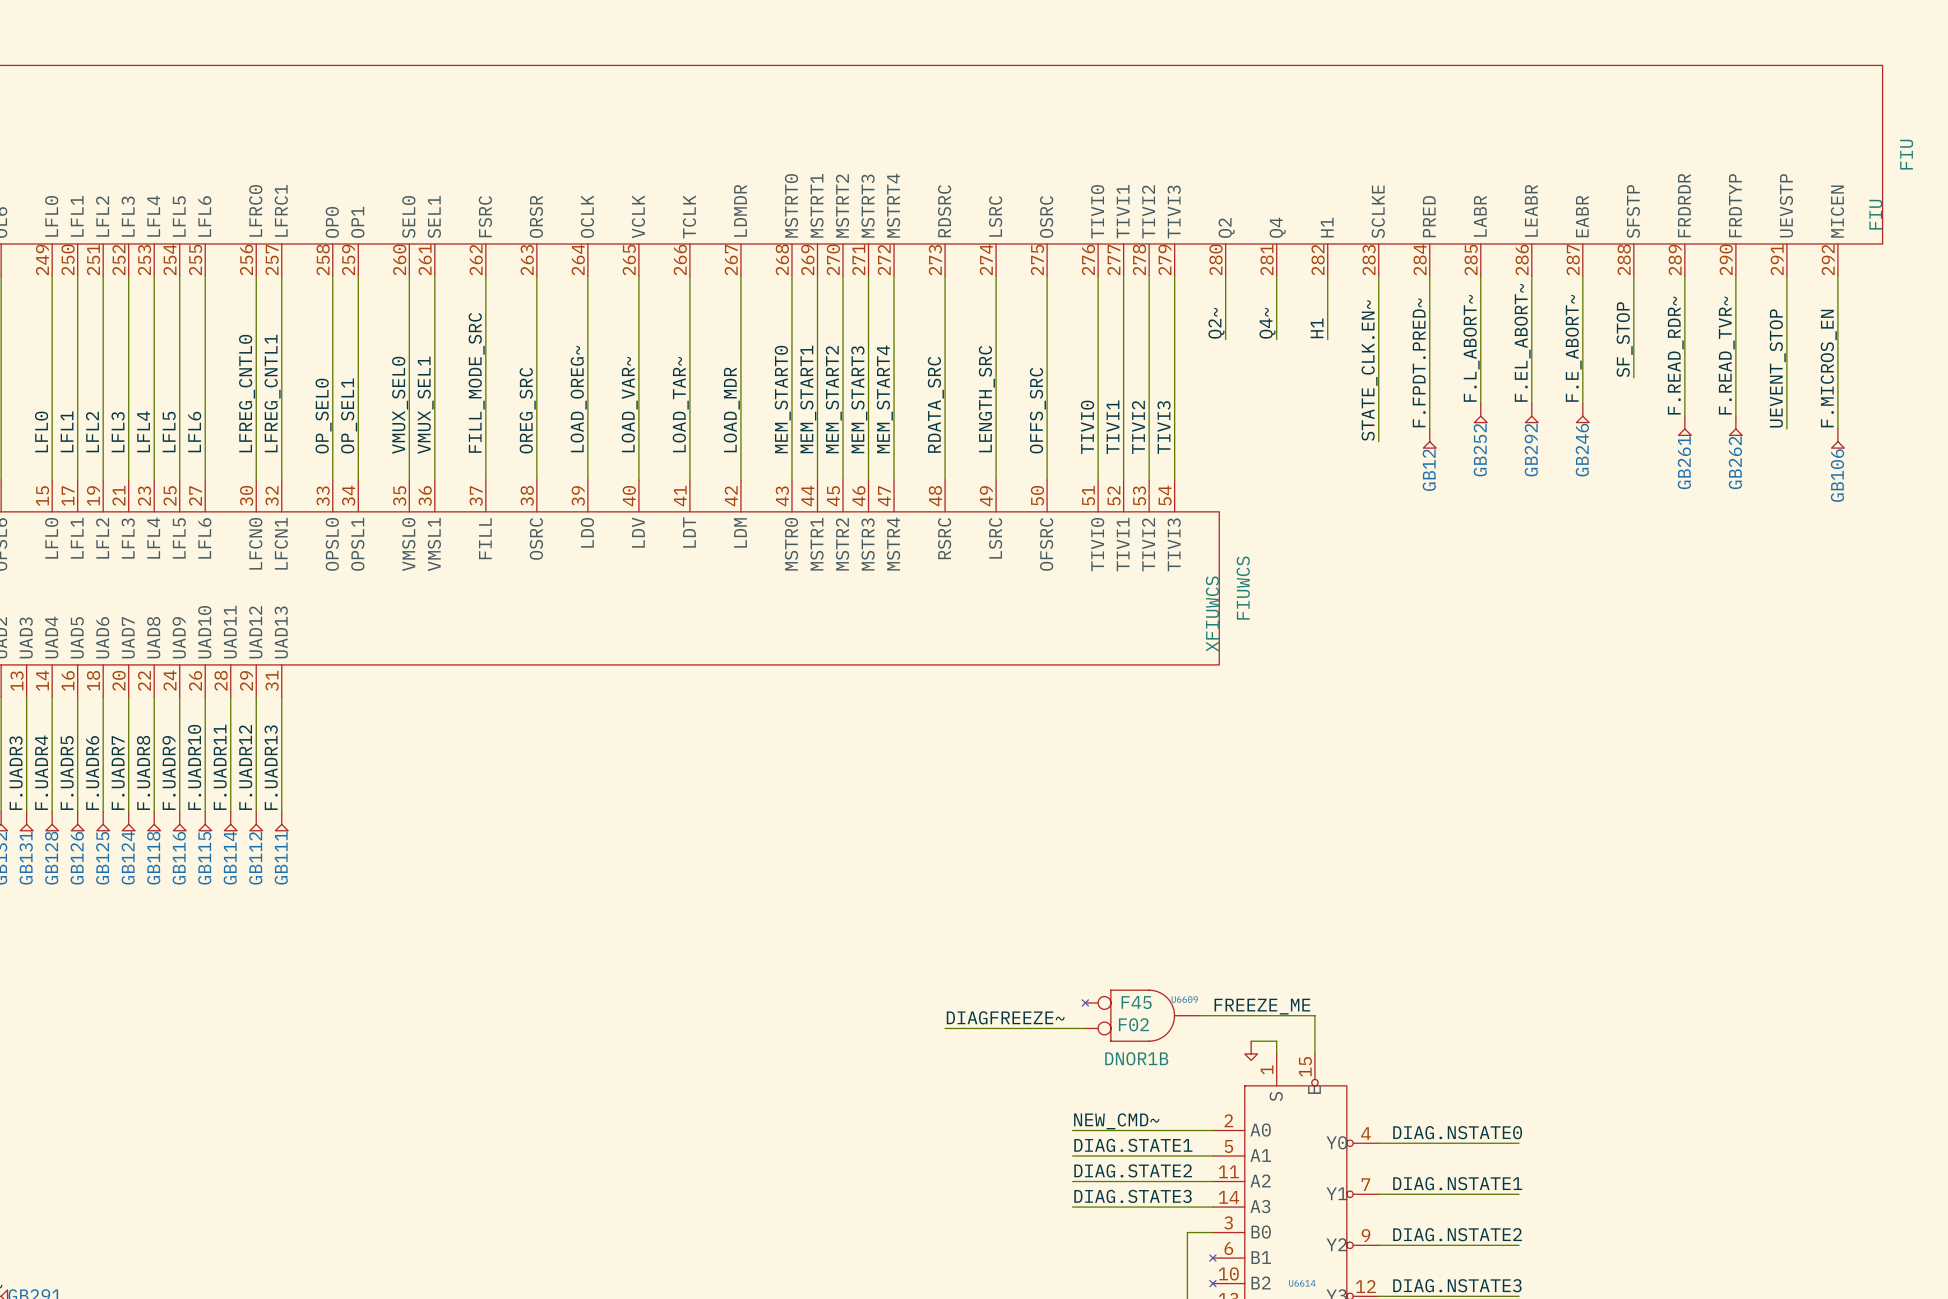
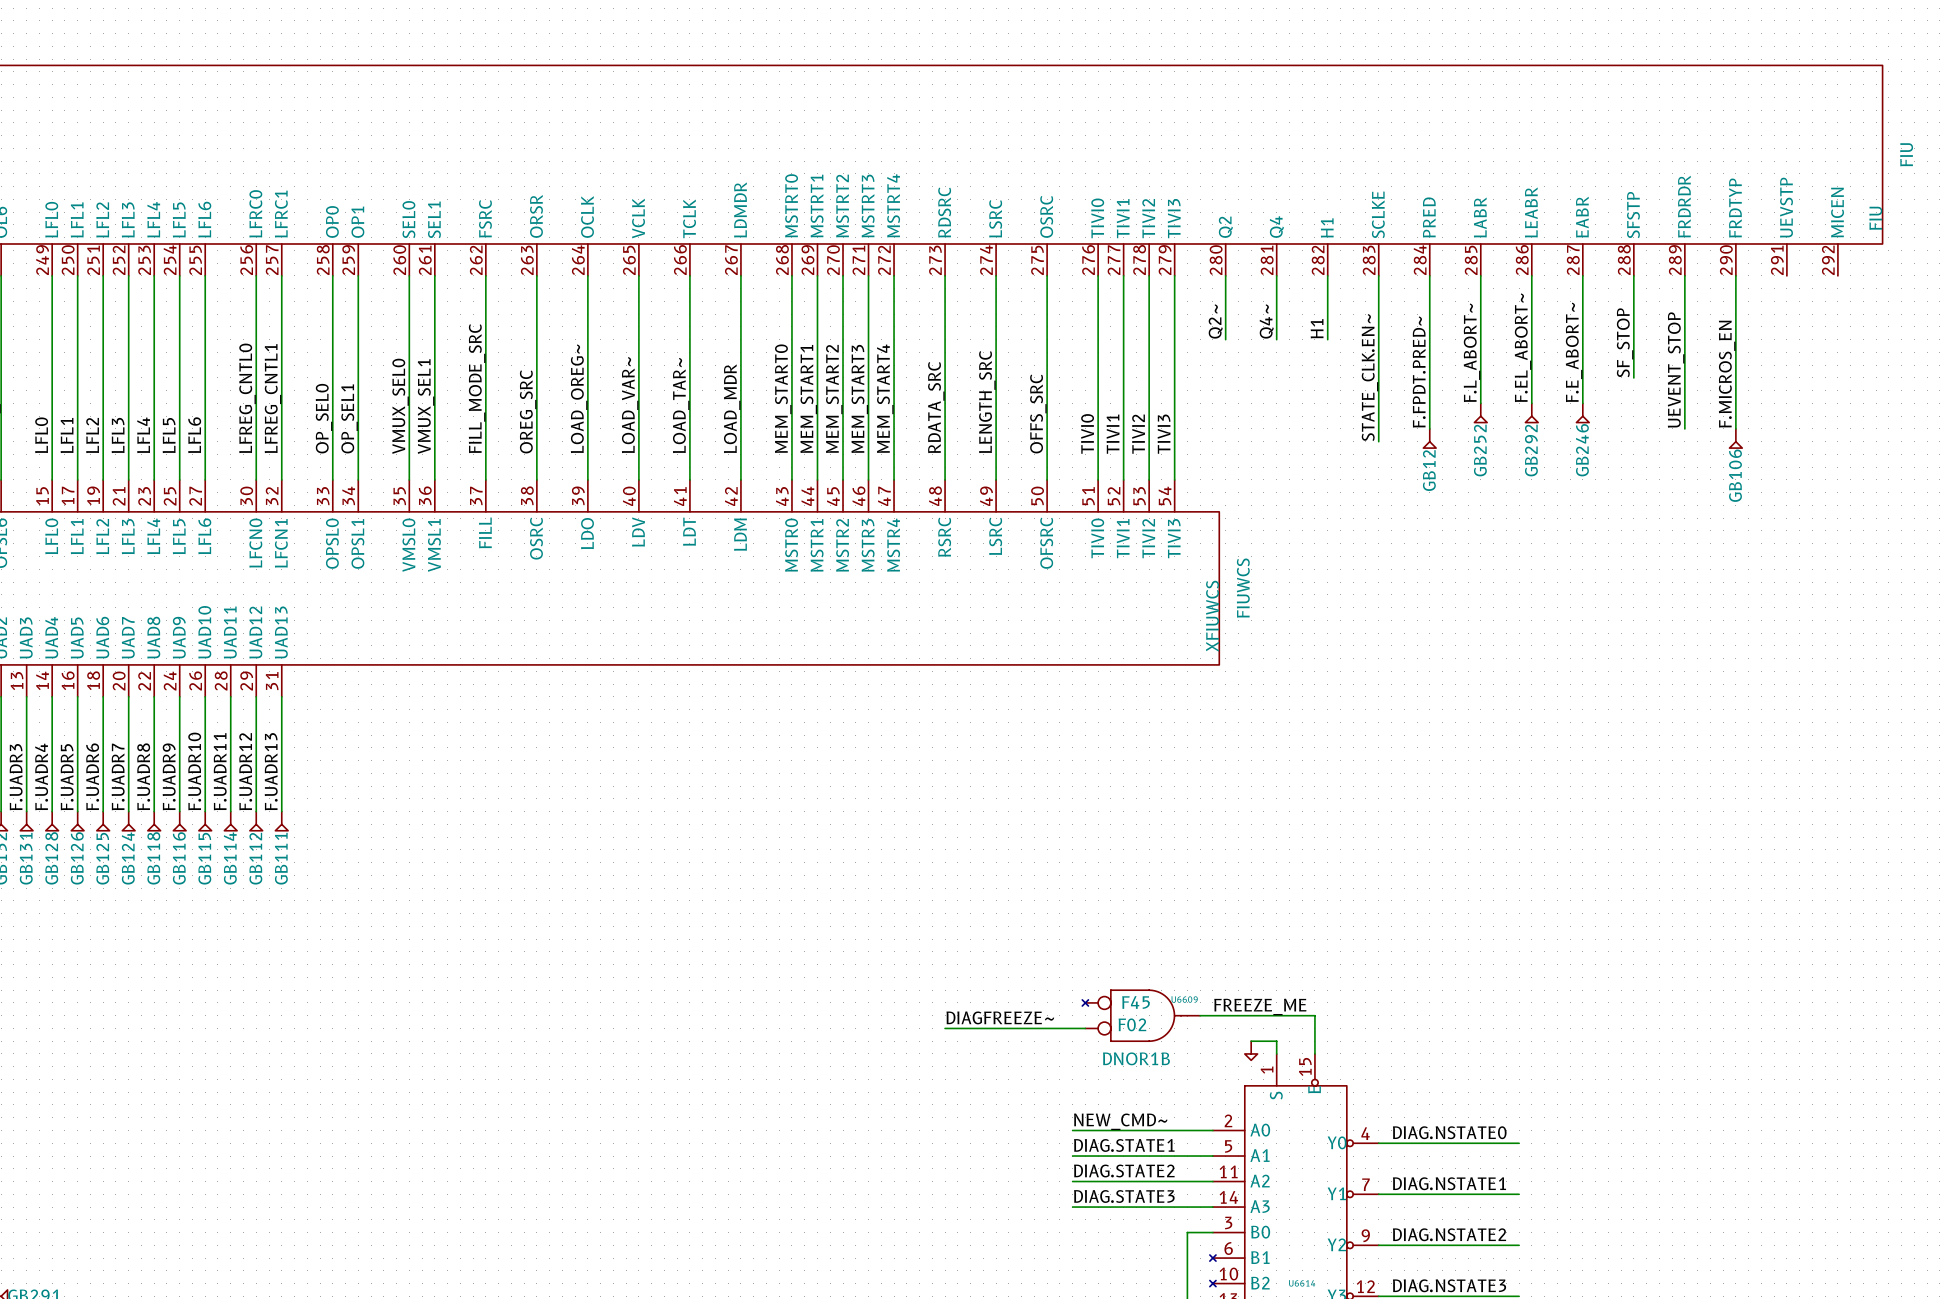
wire: (1786, 275) (1786, 428) -> none
wire: (1837, 275) (1837, 428) -> none
label: F.READ_RDR~ (1675, 355) -> none
label: F.READ_TVR~ (1726, 355) -> none
label position: UEVENT_STOP (1777, 368) -> UEVENT_STOP (1676, 370)
label position: F.MICROS_EN (1828, 368) -> F.MICROS_EN (1727, 374)
GB261: (1684, 425) -> none
GB262: (1735, 425) -> none
GB106 position: (1837, 438) -> (1735, 438)

